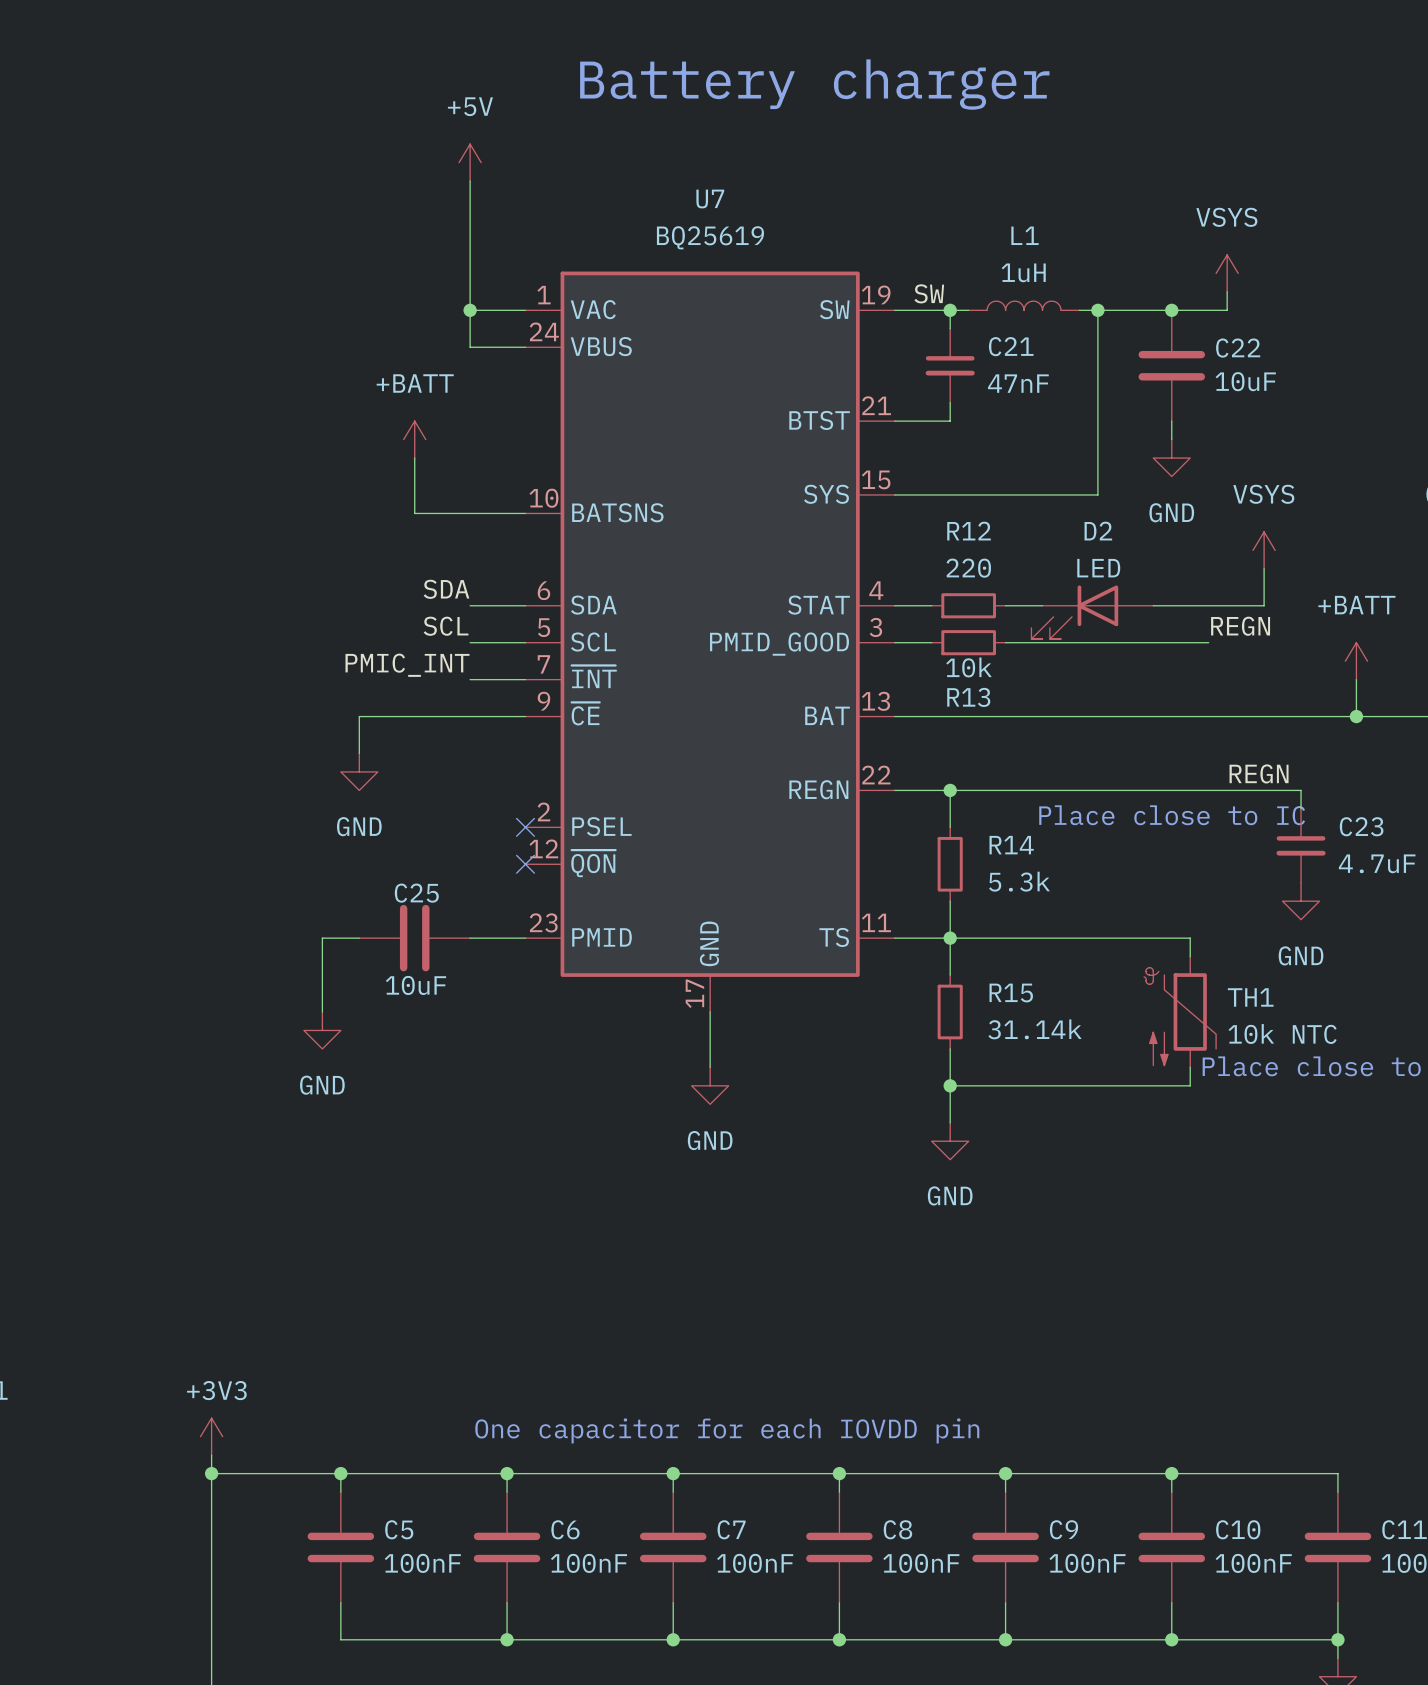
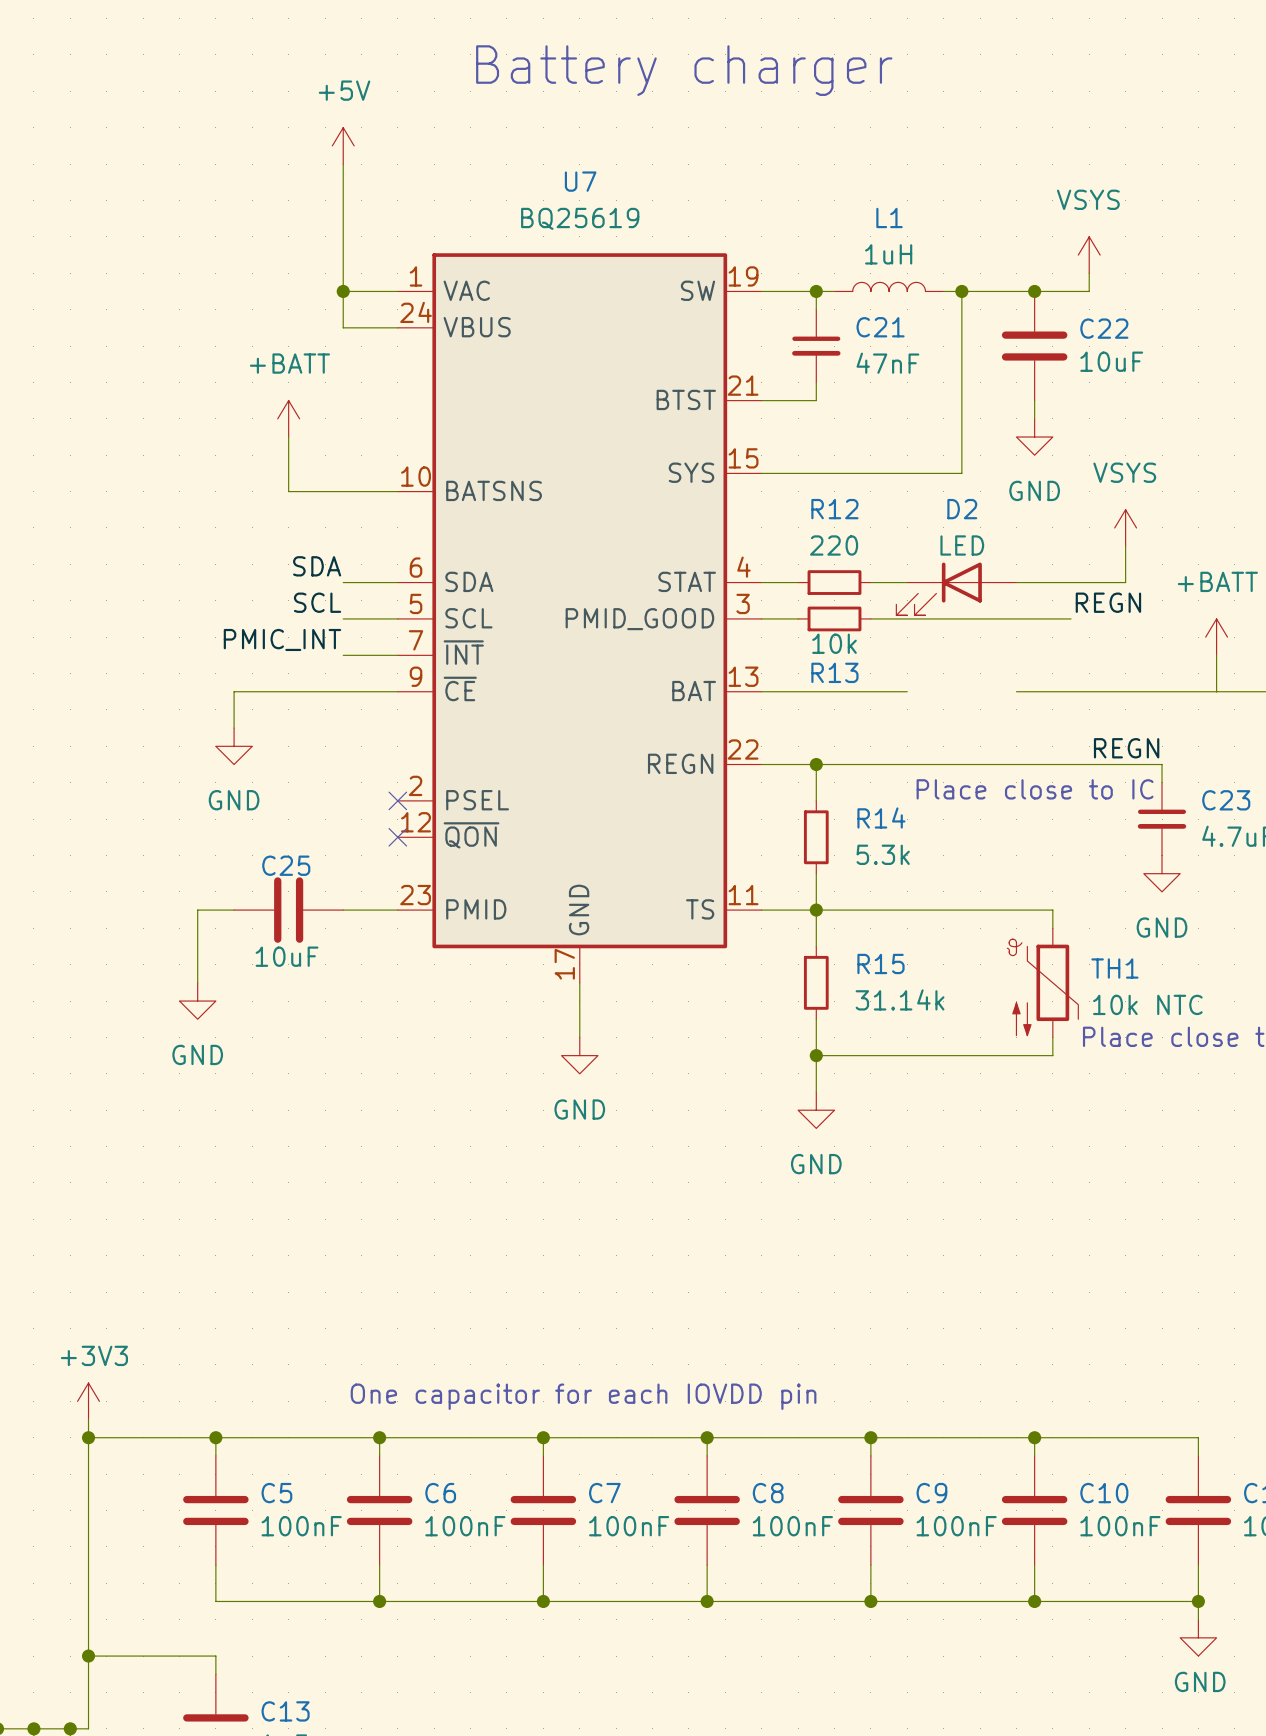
label: SW (929, 293) -> none
wire: (1042, 716) (1153, 716) -> none
junction: (1356, 716) -> none

